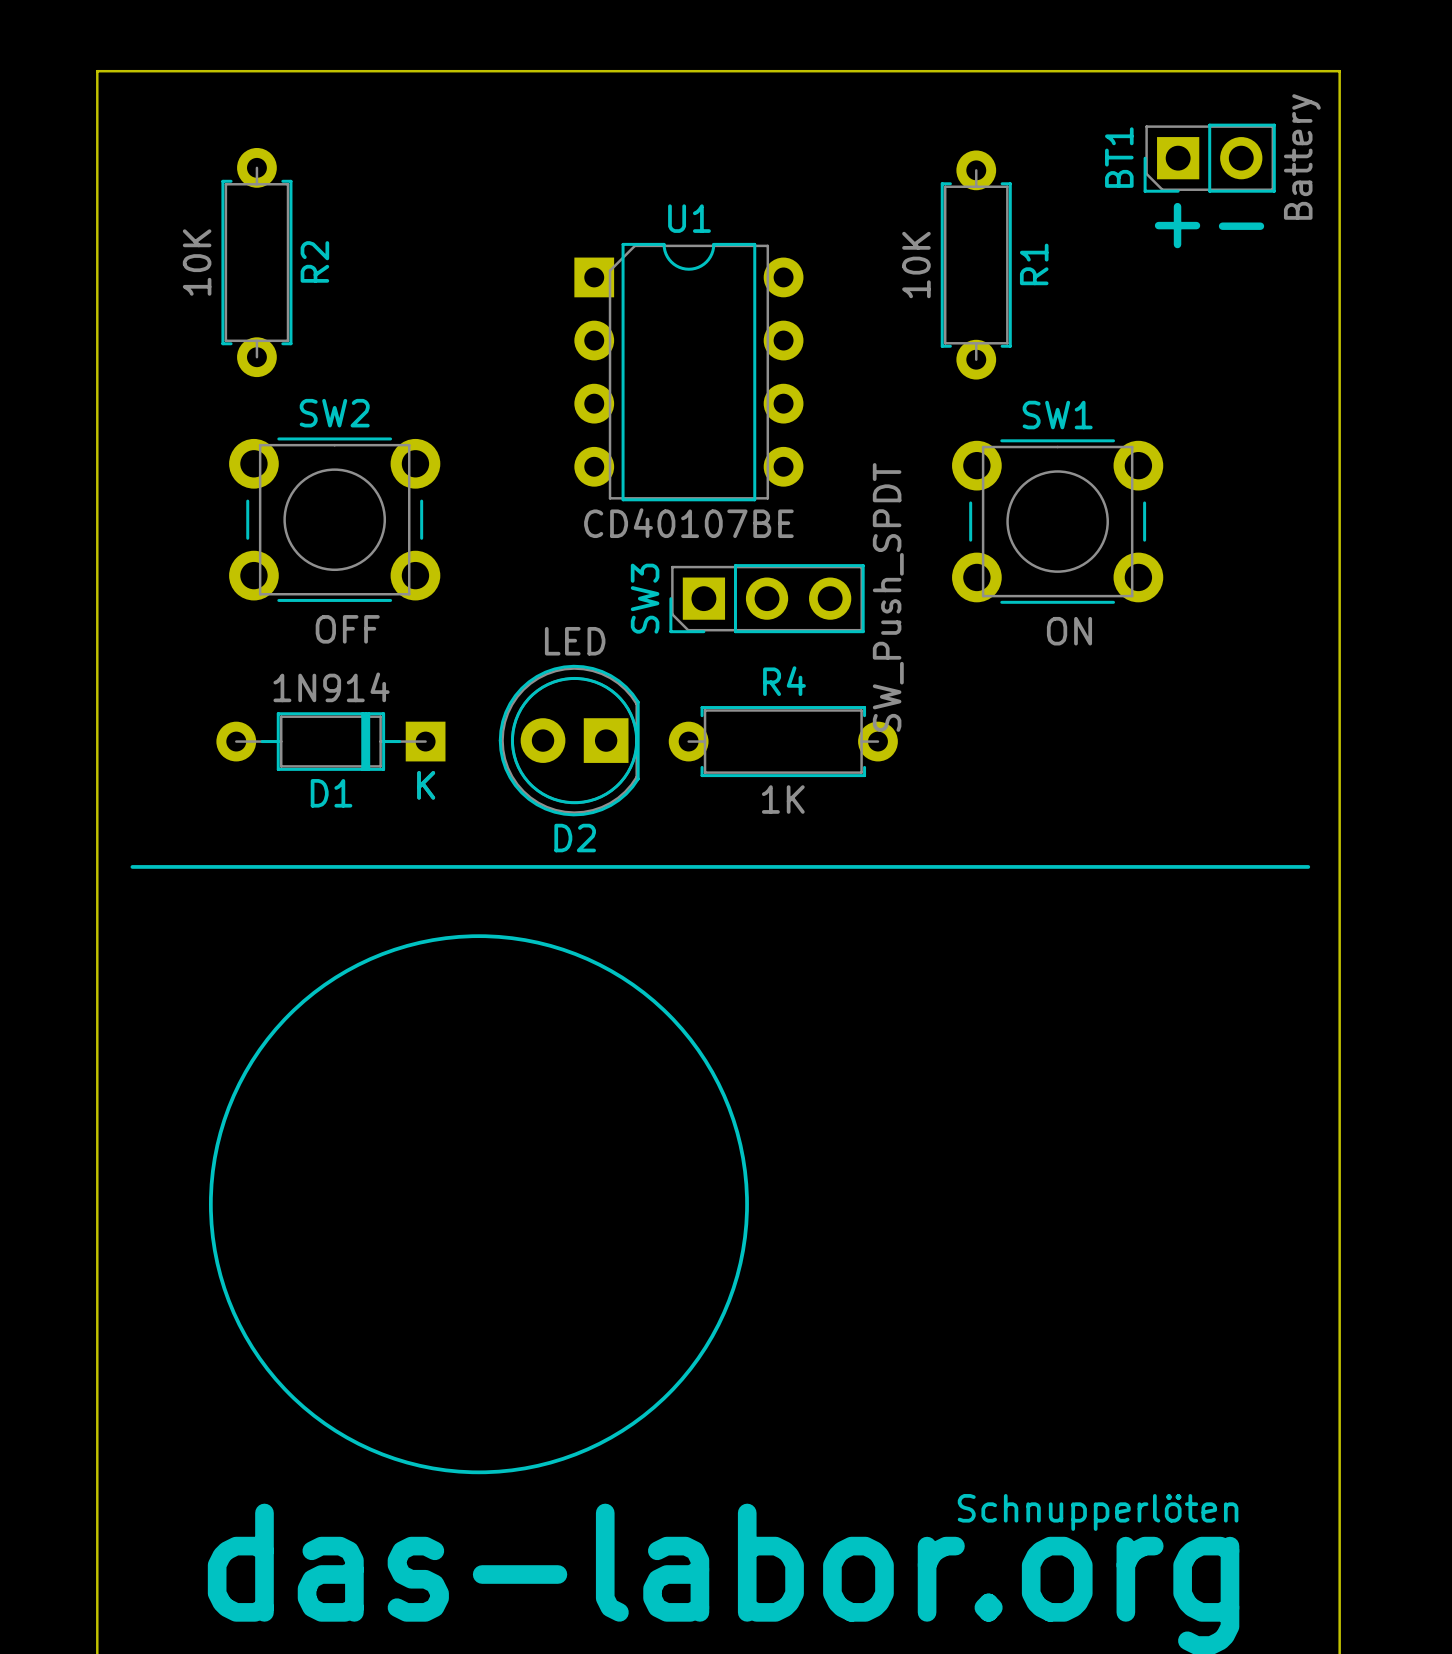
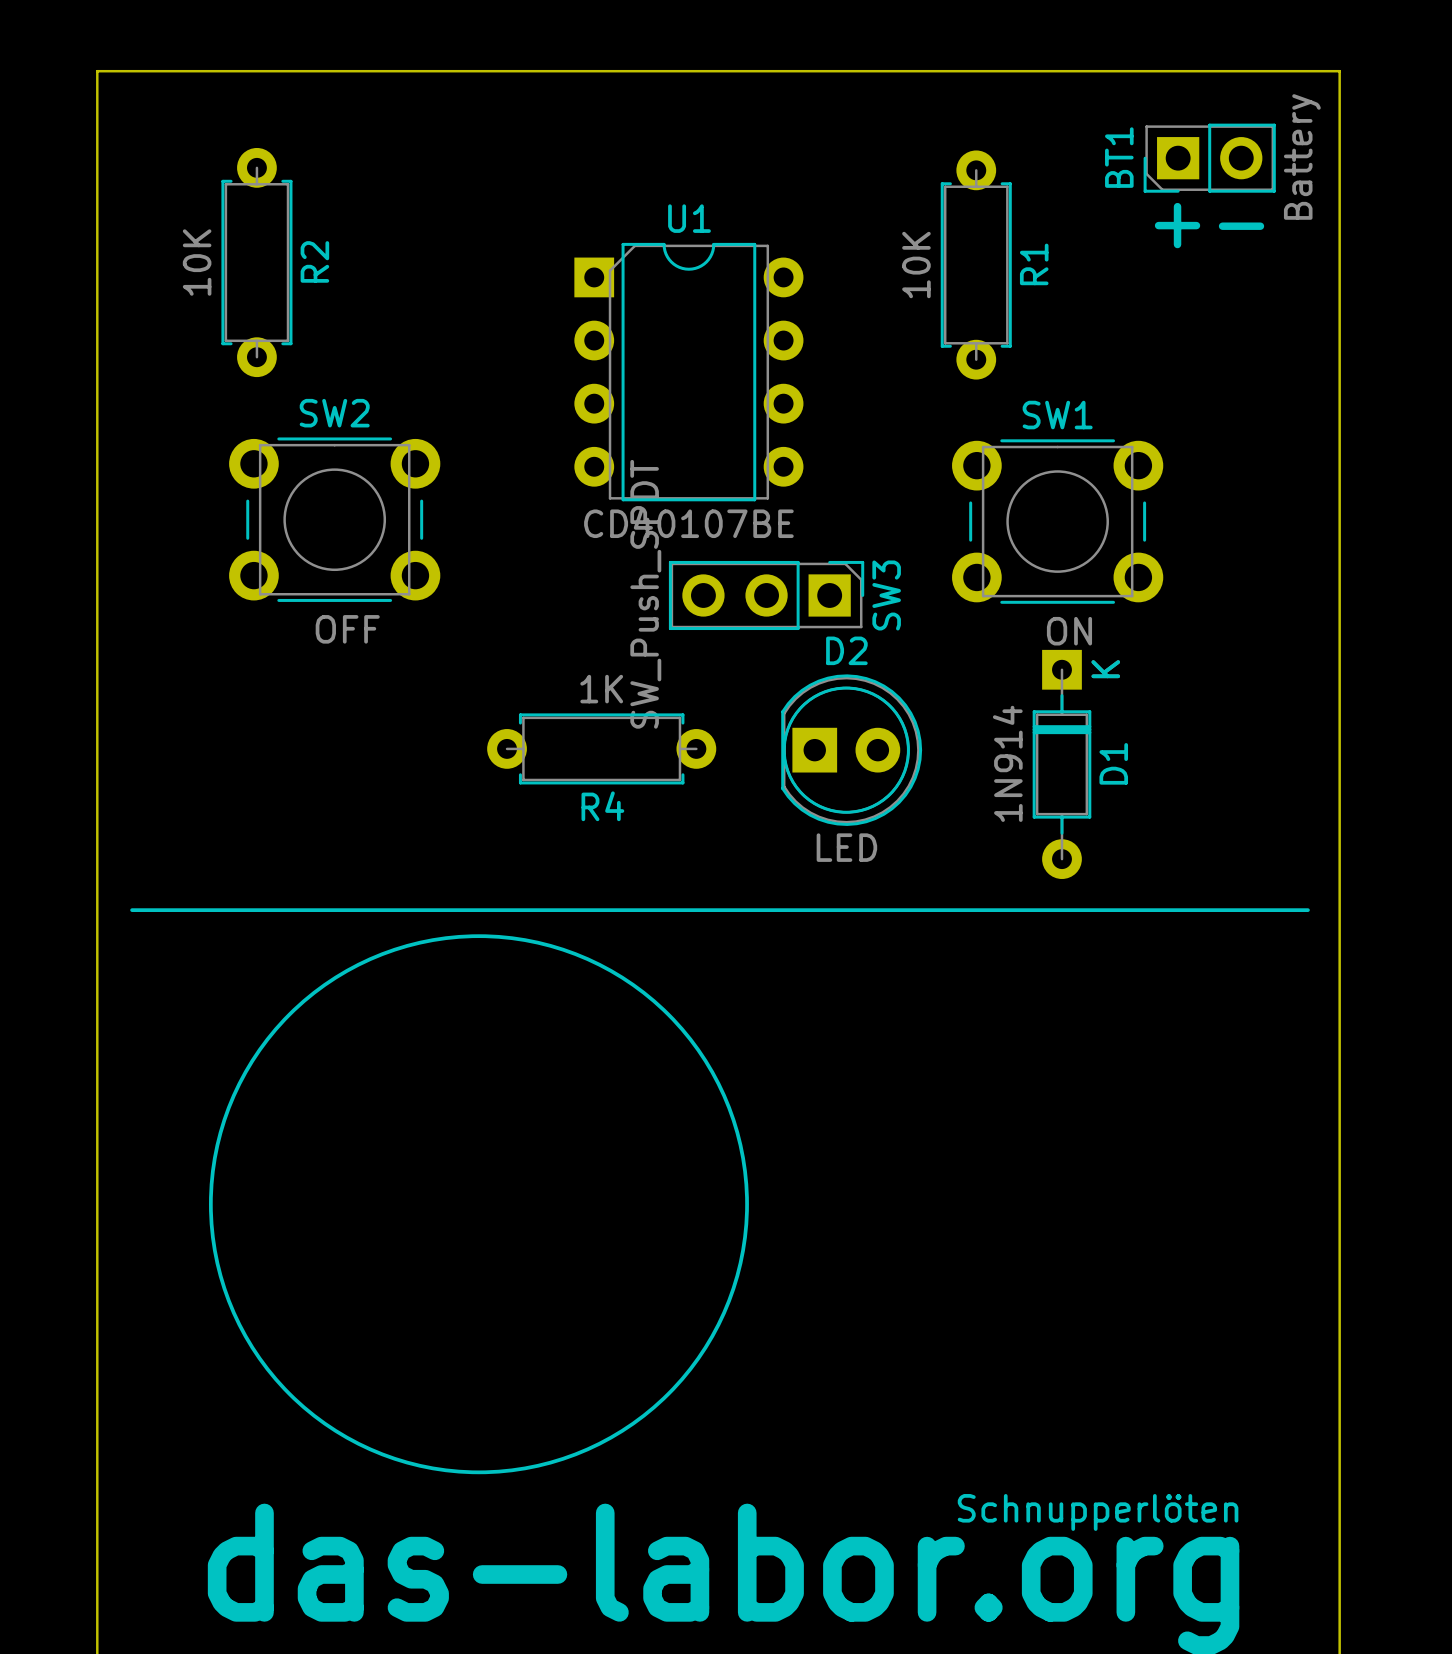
SW3 rotation: 0° (767, 598) -> 180° (766, 595)
R4 name position: R4 (784, 681) -> R4 (602, 806)
D2 rotation: 0° (569, 740) -> 180° (851, 750)
D2 position: (569, 740) -> (851, 750)
D1 rotation: 0° (330, 741) -> 90° counterclockwise (1061, 764)
D1 position: (330, 741) -> (1061, 764)
R4 position: (783, 741) -> (601, 748)
R4 value position: 1K (783, 799) -> 1K (601, 689)
line: (132, 866) (1308, 866) -> (132, 910) (1307, 910)

